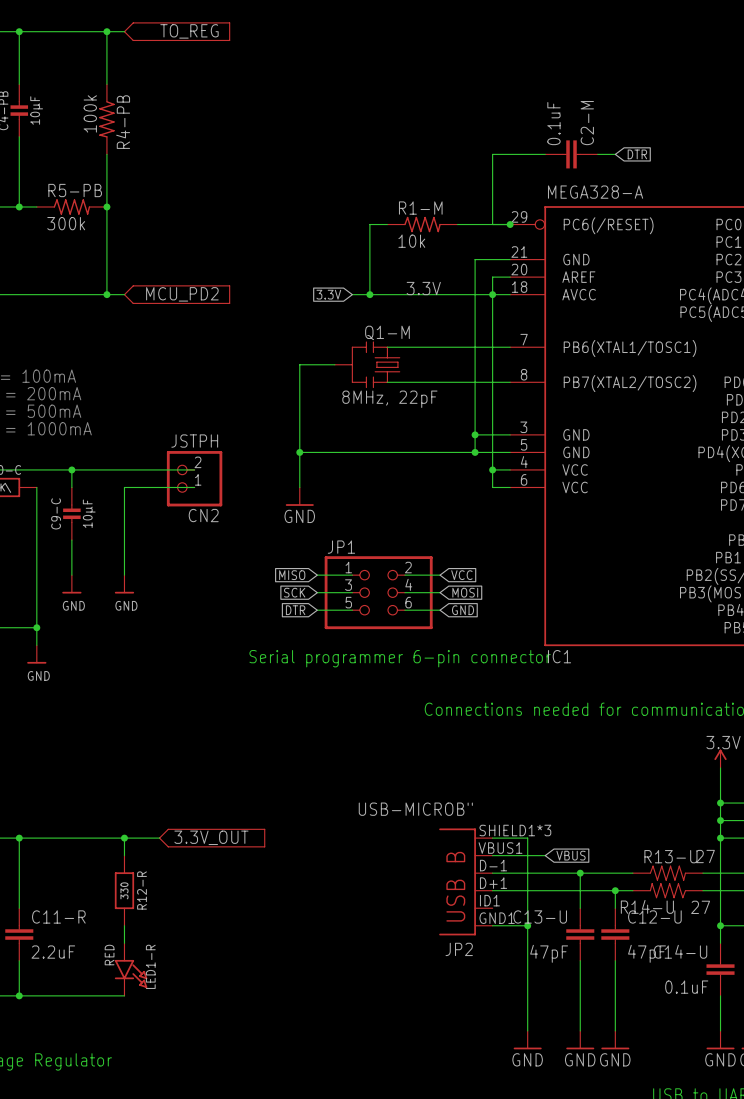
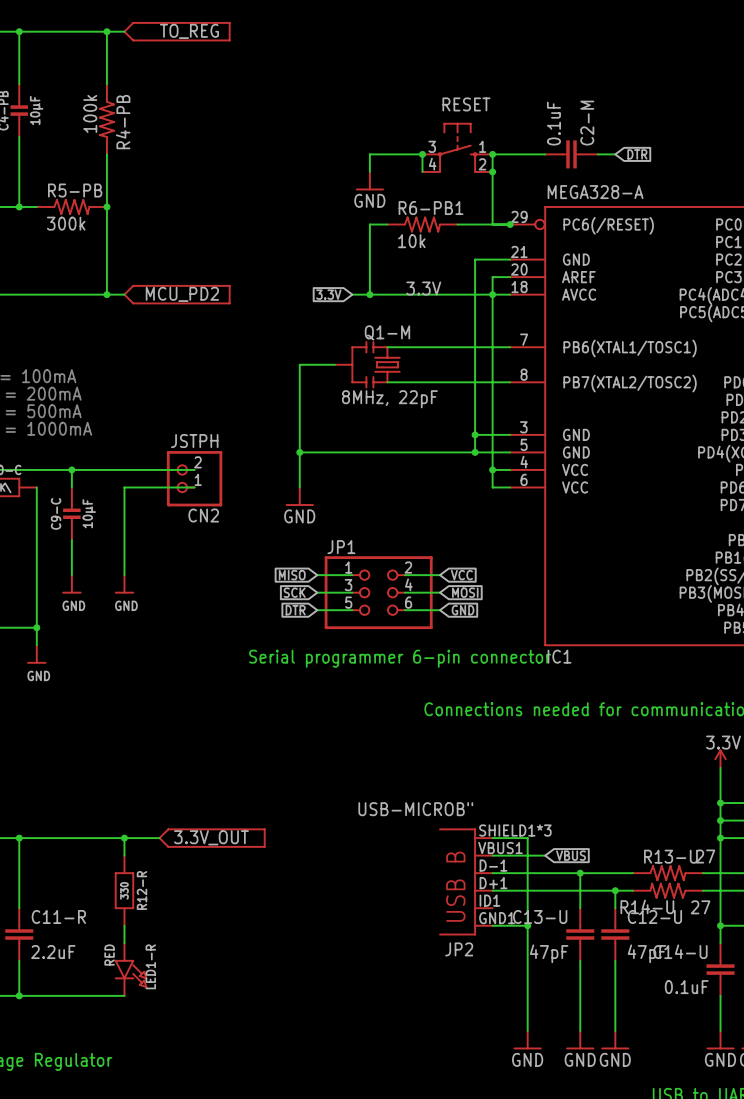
RESET: none -> (457, 147)
junction: none -> (422, 154)
junction: none -> (492, 154)
wire: none -> (369, 171) (369, 154) (422, 154) (422, 171)
junction: none -> (492, 171)
power symbol: none -> GND (369, 181)
R1-M name: R1-M (420, 208) -> R6-PB1 (431, 208)

